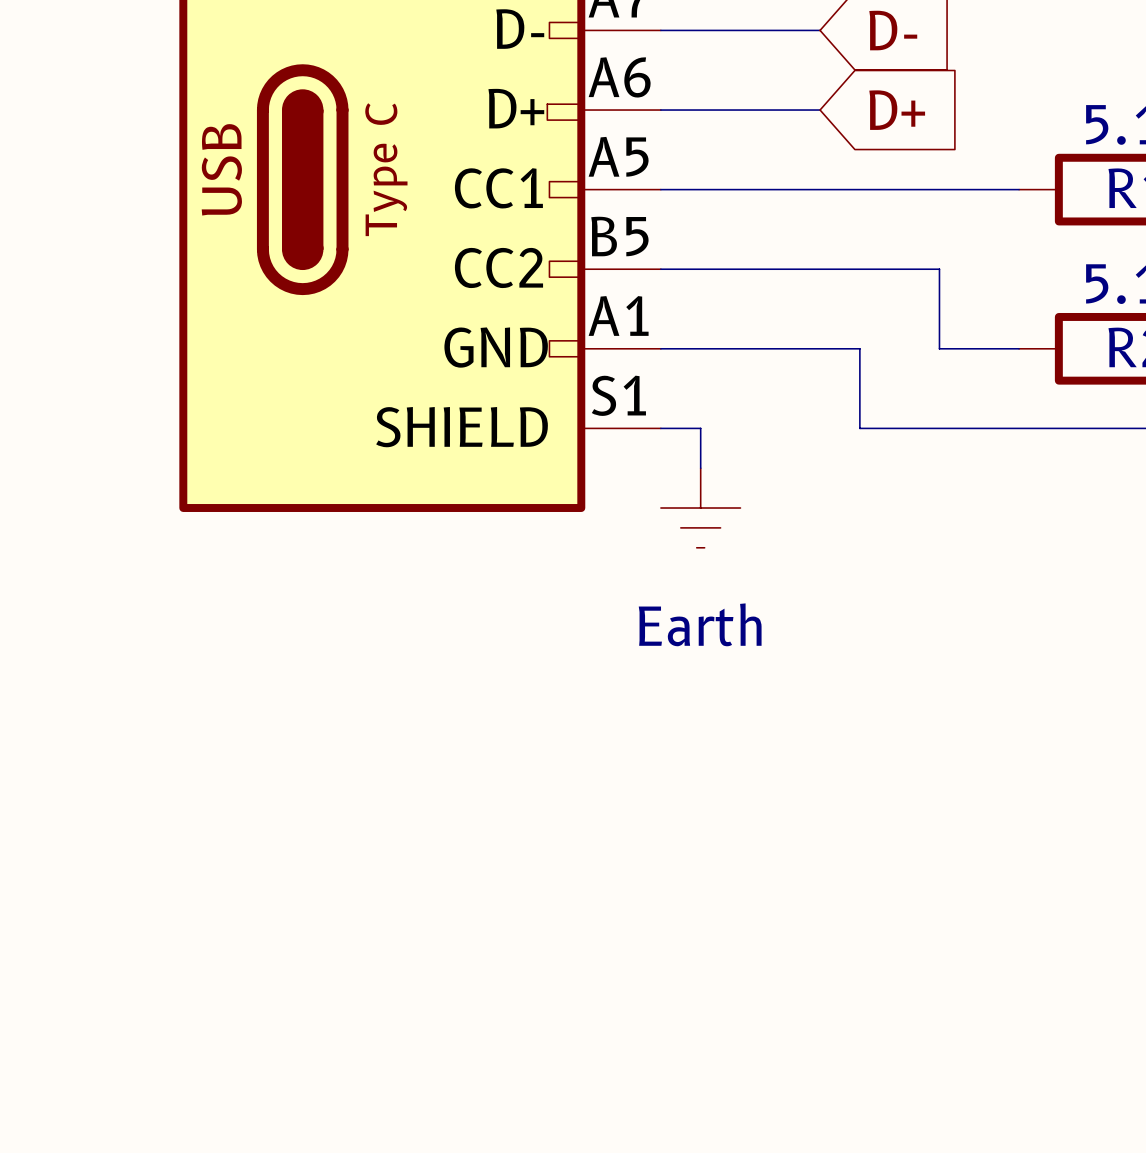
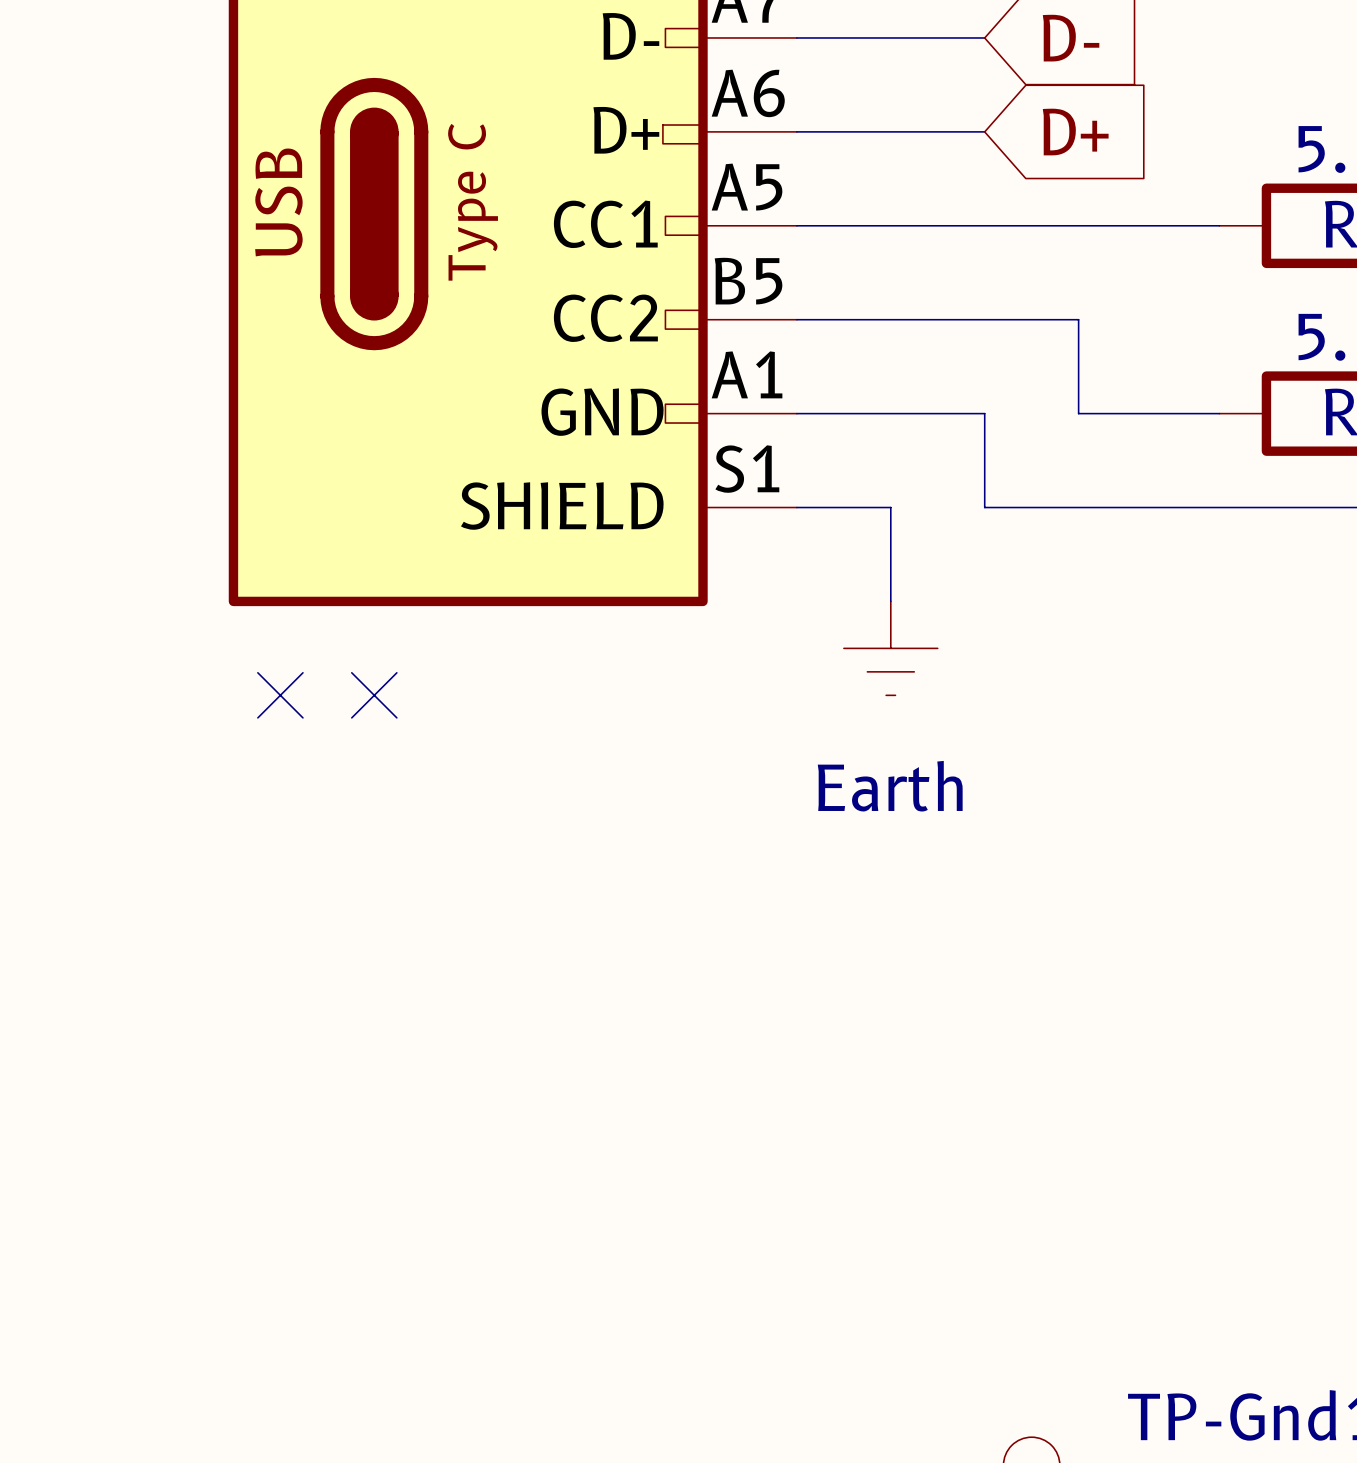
wire: (899, 269) (939, 269) (939, 348) -> (1078, 319) (1078, 413) (1125, 413)
wire: (820, 348) (859, 348) (859, 428) -> (984, 413) (984, 507) (1031, 507)
wire: (700, 428) (700, 468) -> (843, 507) (890, 507) (890, 601)
power symbol position: Earth (700, 508) -> Earth (890, 648)
no-connect mark: none -> (280, 695)
no-connect mark: none -> (374, 695)

